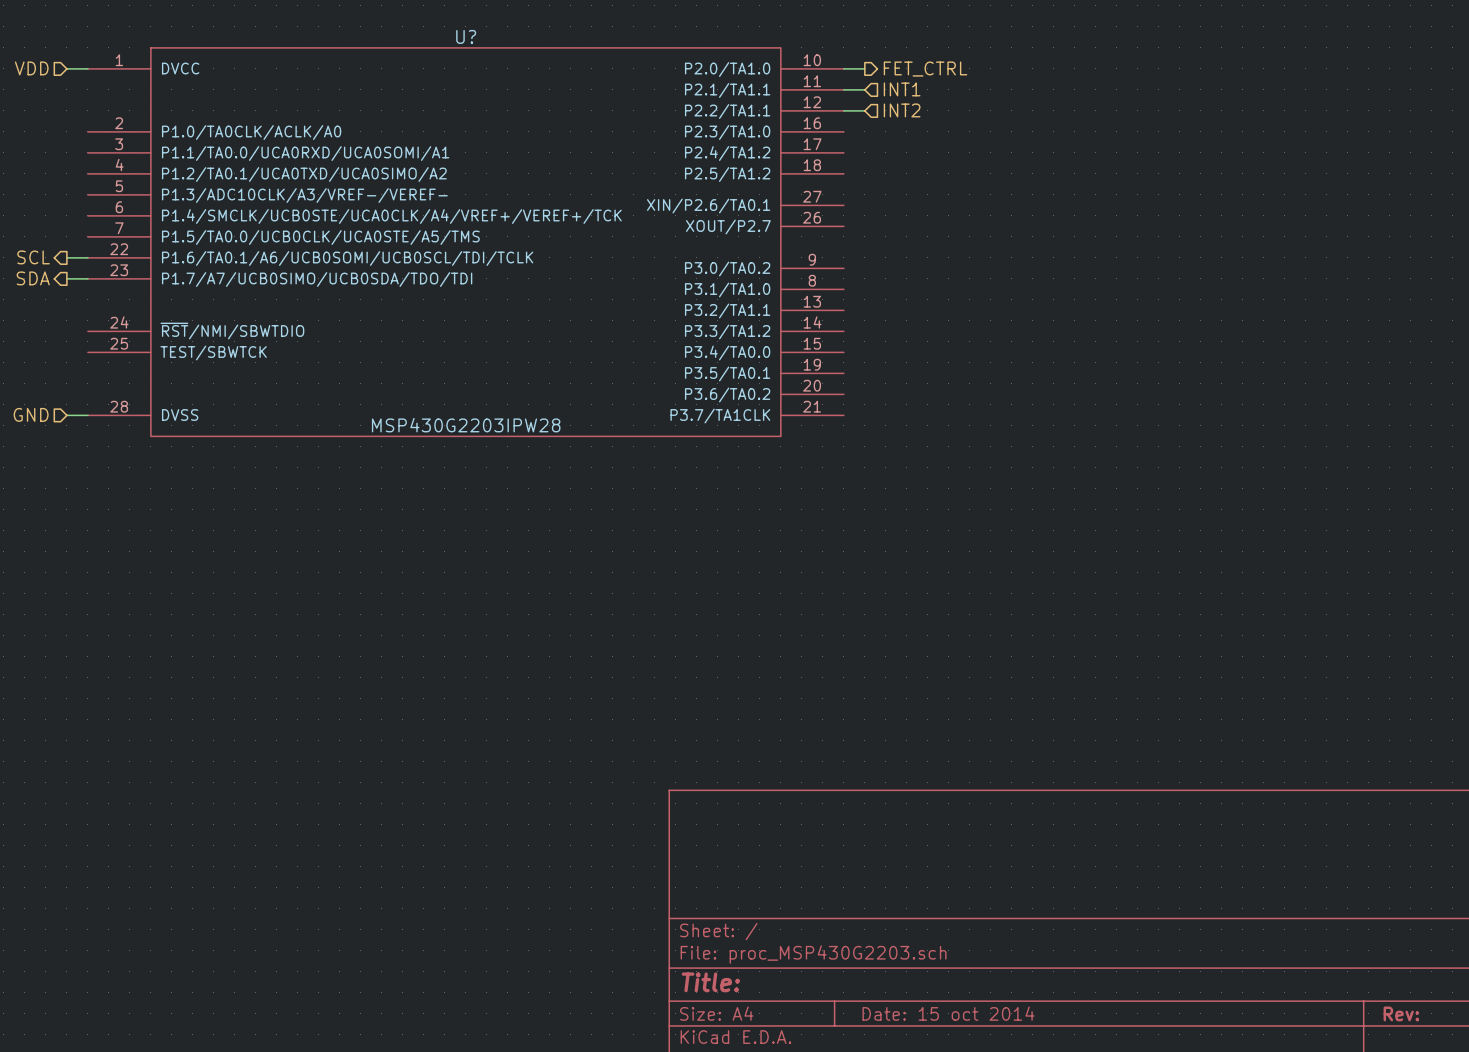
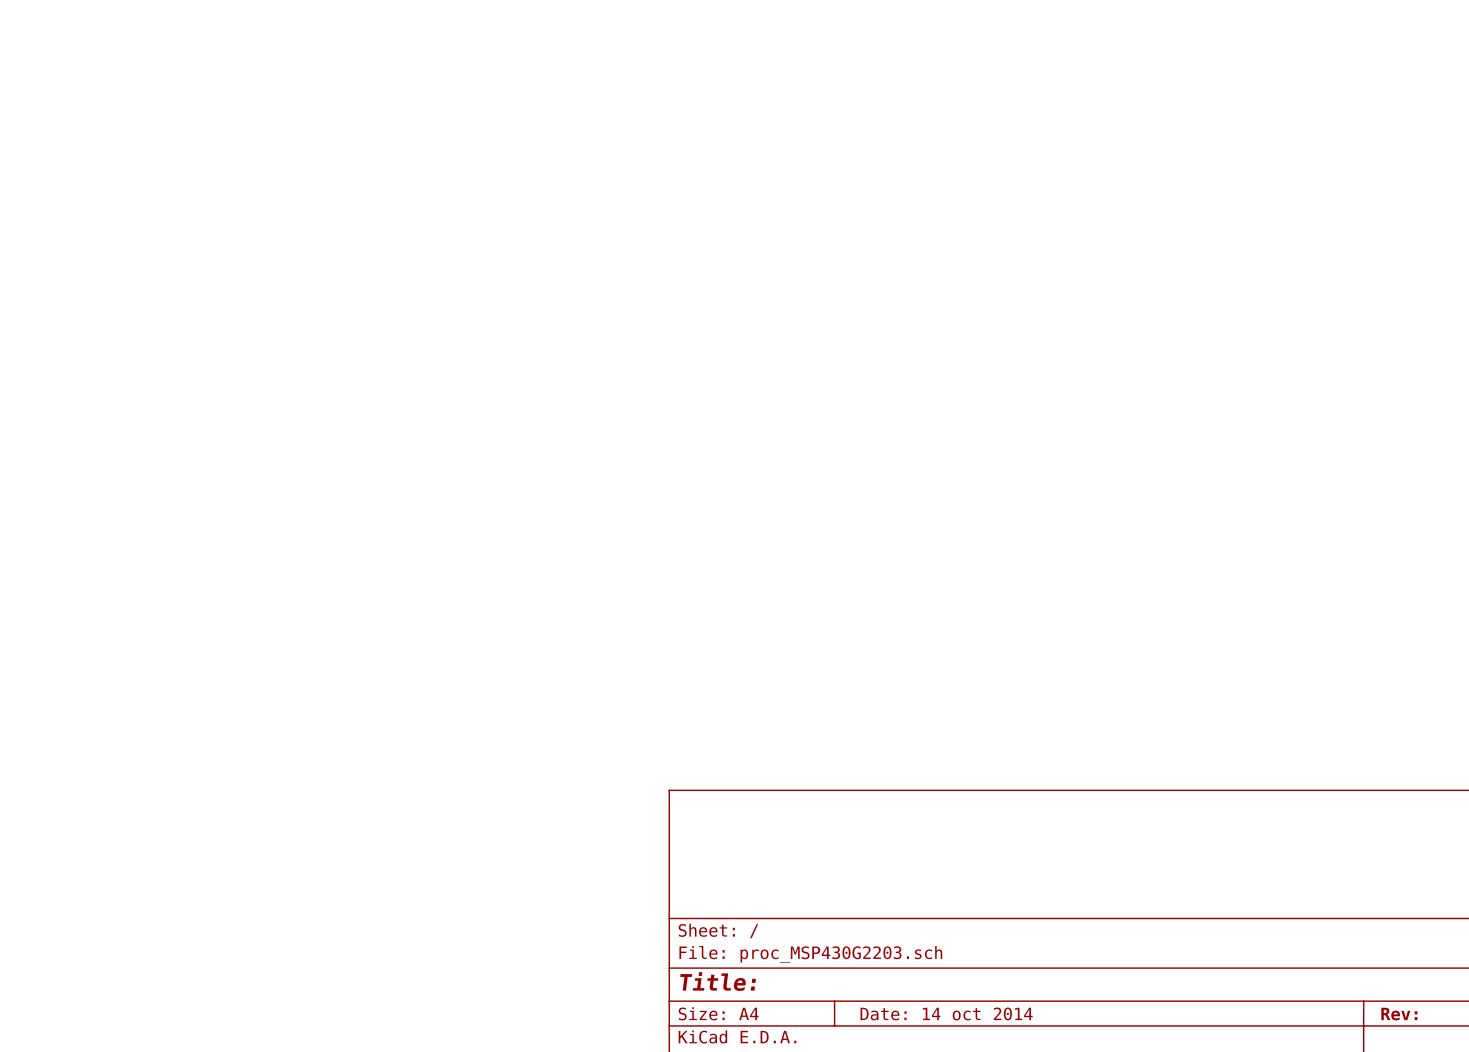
hierarchical label: VDD (31, 68) -> none
wire: (66, 68) (87, 68) -> none
wire: (843, 68) (864, 68) -> none
hierarchical label: FET_CTRL (925, 69) -> none
wire: (843, 89) (864, 89) -> none
hierarchical label: INT1 (902, 89) -> none
wire: (843, 110) (864, 110) -> none
hierarchical label: INT2 (902, 110) -> none
U?: MSP430G2203IPW28 (465, 242) -> none
hierarchical label: SCL (33, 257) -> none
wire: (66, 257) (87, 257) -> none
hierarchical label: SDA (33, 278) -> none
wire: (66, 278) (87, 278) -> none
hierarchical label: GND (31, 414) -> none
wire: (66, 415) (87, 415) -> none
title block: Date: 15 oct 2014 (948, 1013) -> Date: 14 oct 2014 (946, 1013)

